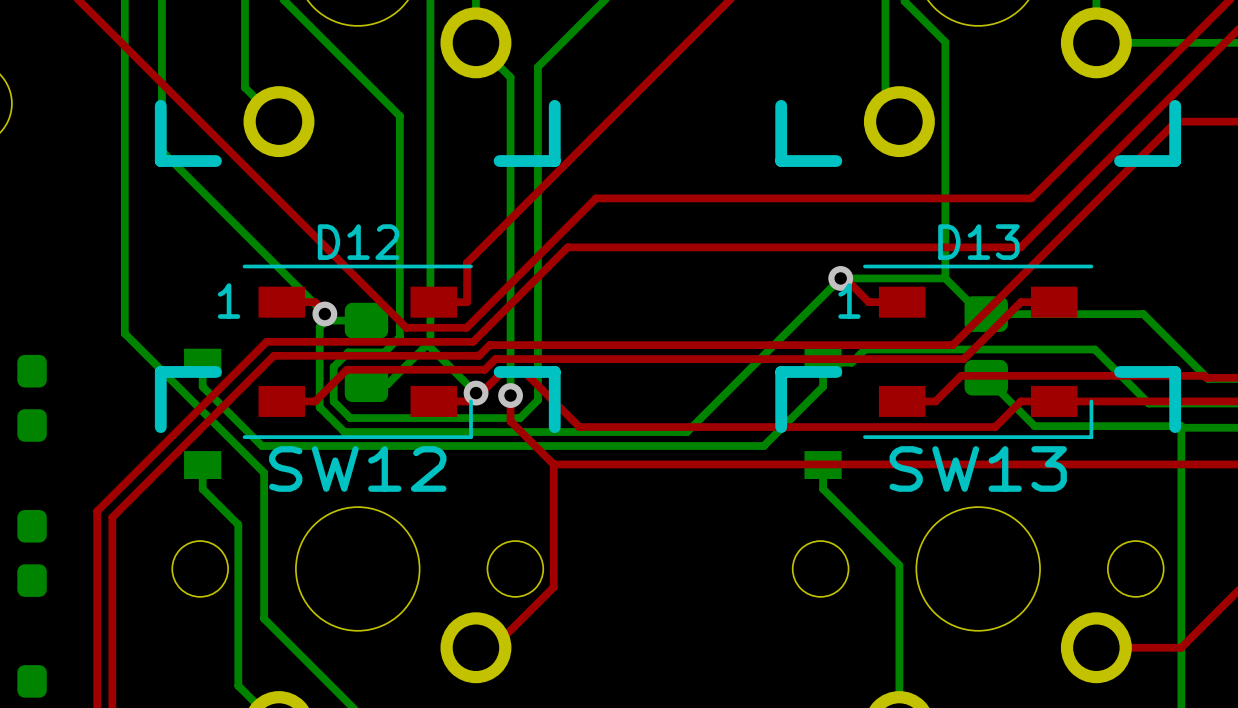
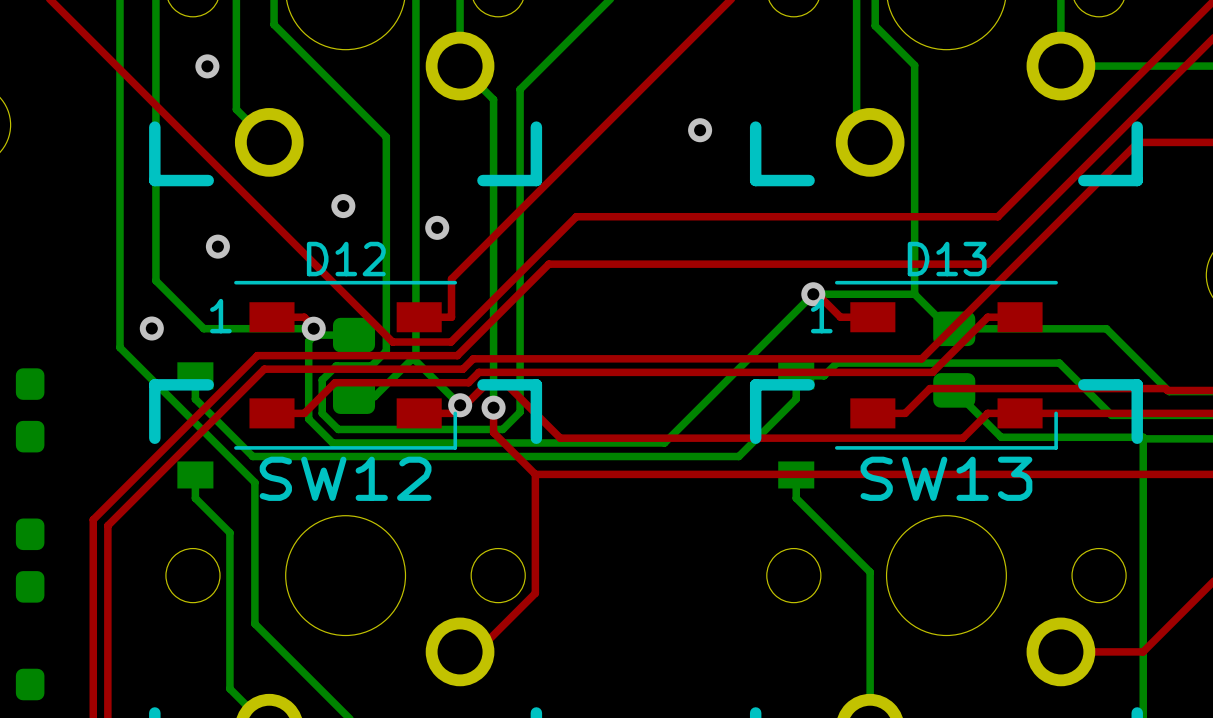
via: none -> (207, 66)
via: none -> (700, 130)
bottom track: (161, 151) (324, 314) -> (155, 170) (155, 280) (203, 328) (313, 328)
via: none -> (343, 206)
via: none -> (437, 227)
via: none -> (217, 246)
via: none -> (151, 328)

